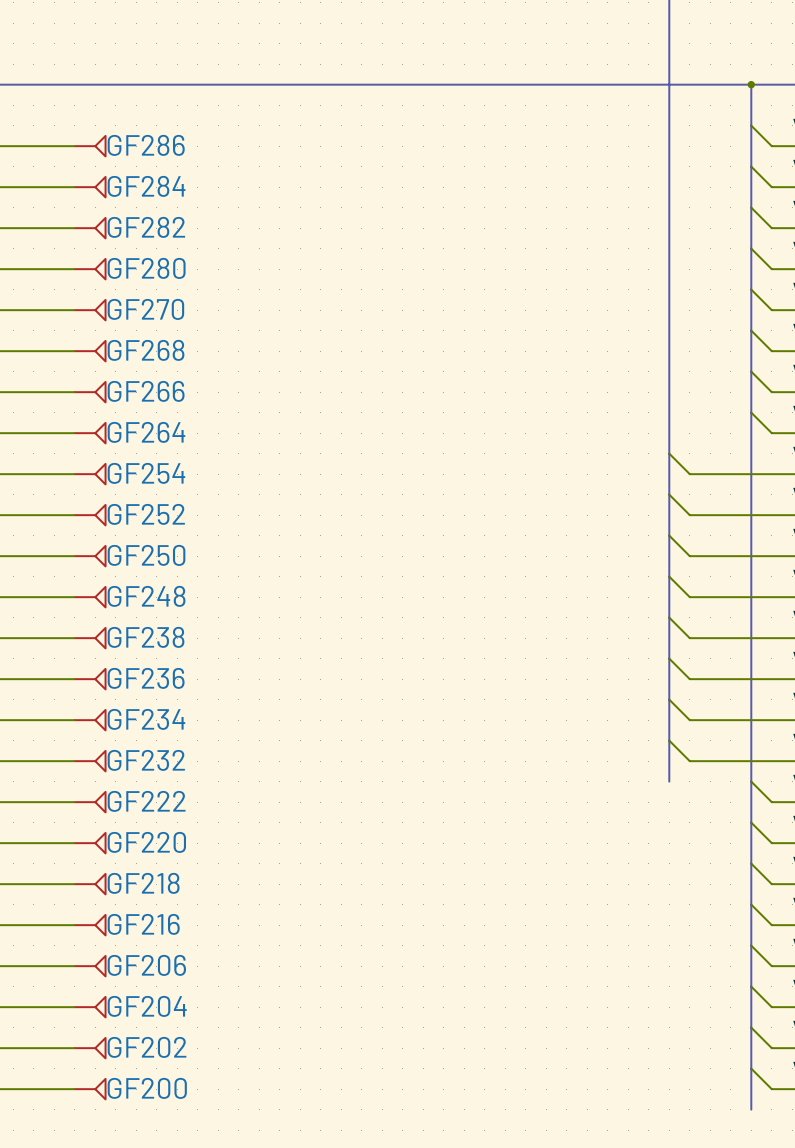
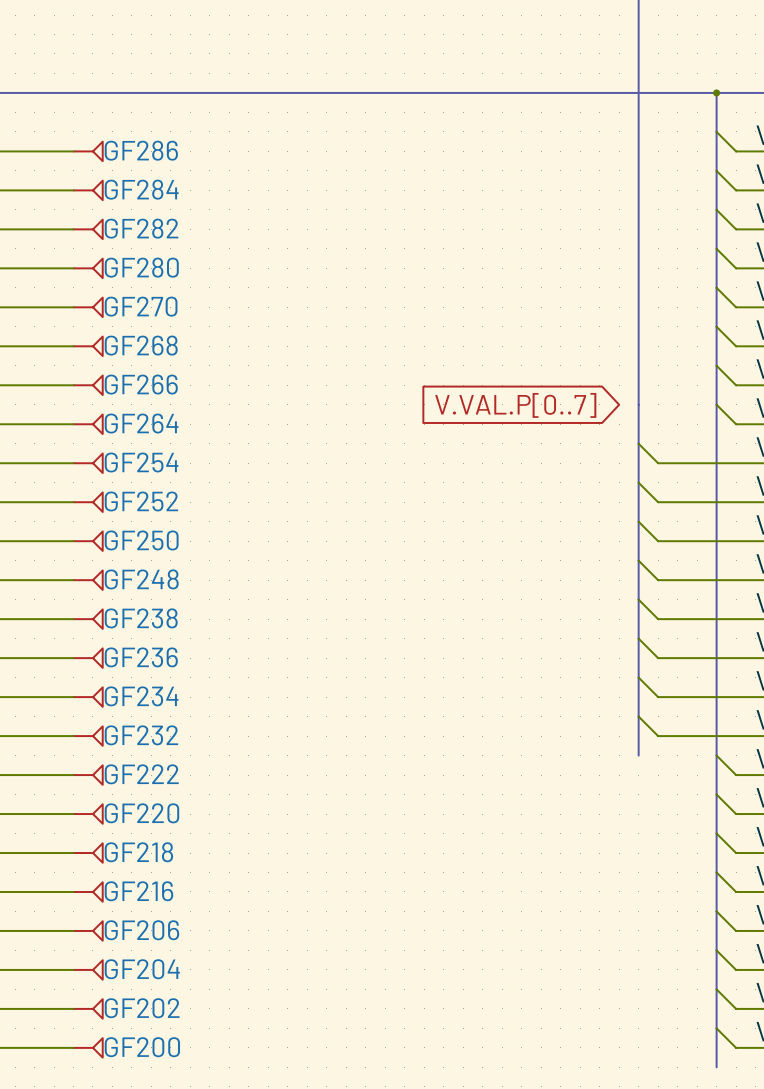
global label: none -> V.VAL.P[0..7] (515, 405)

